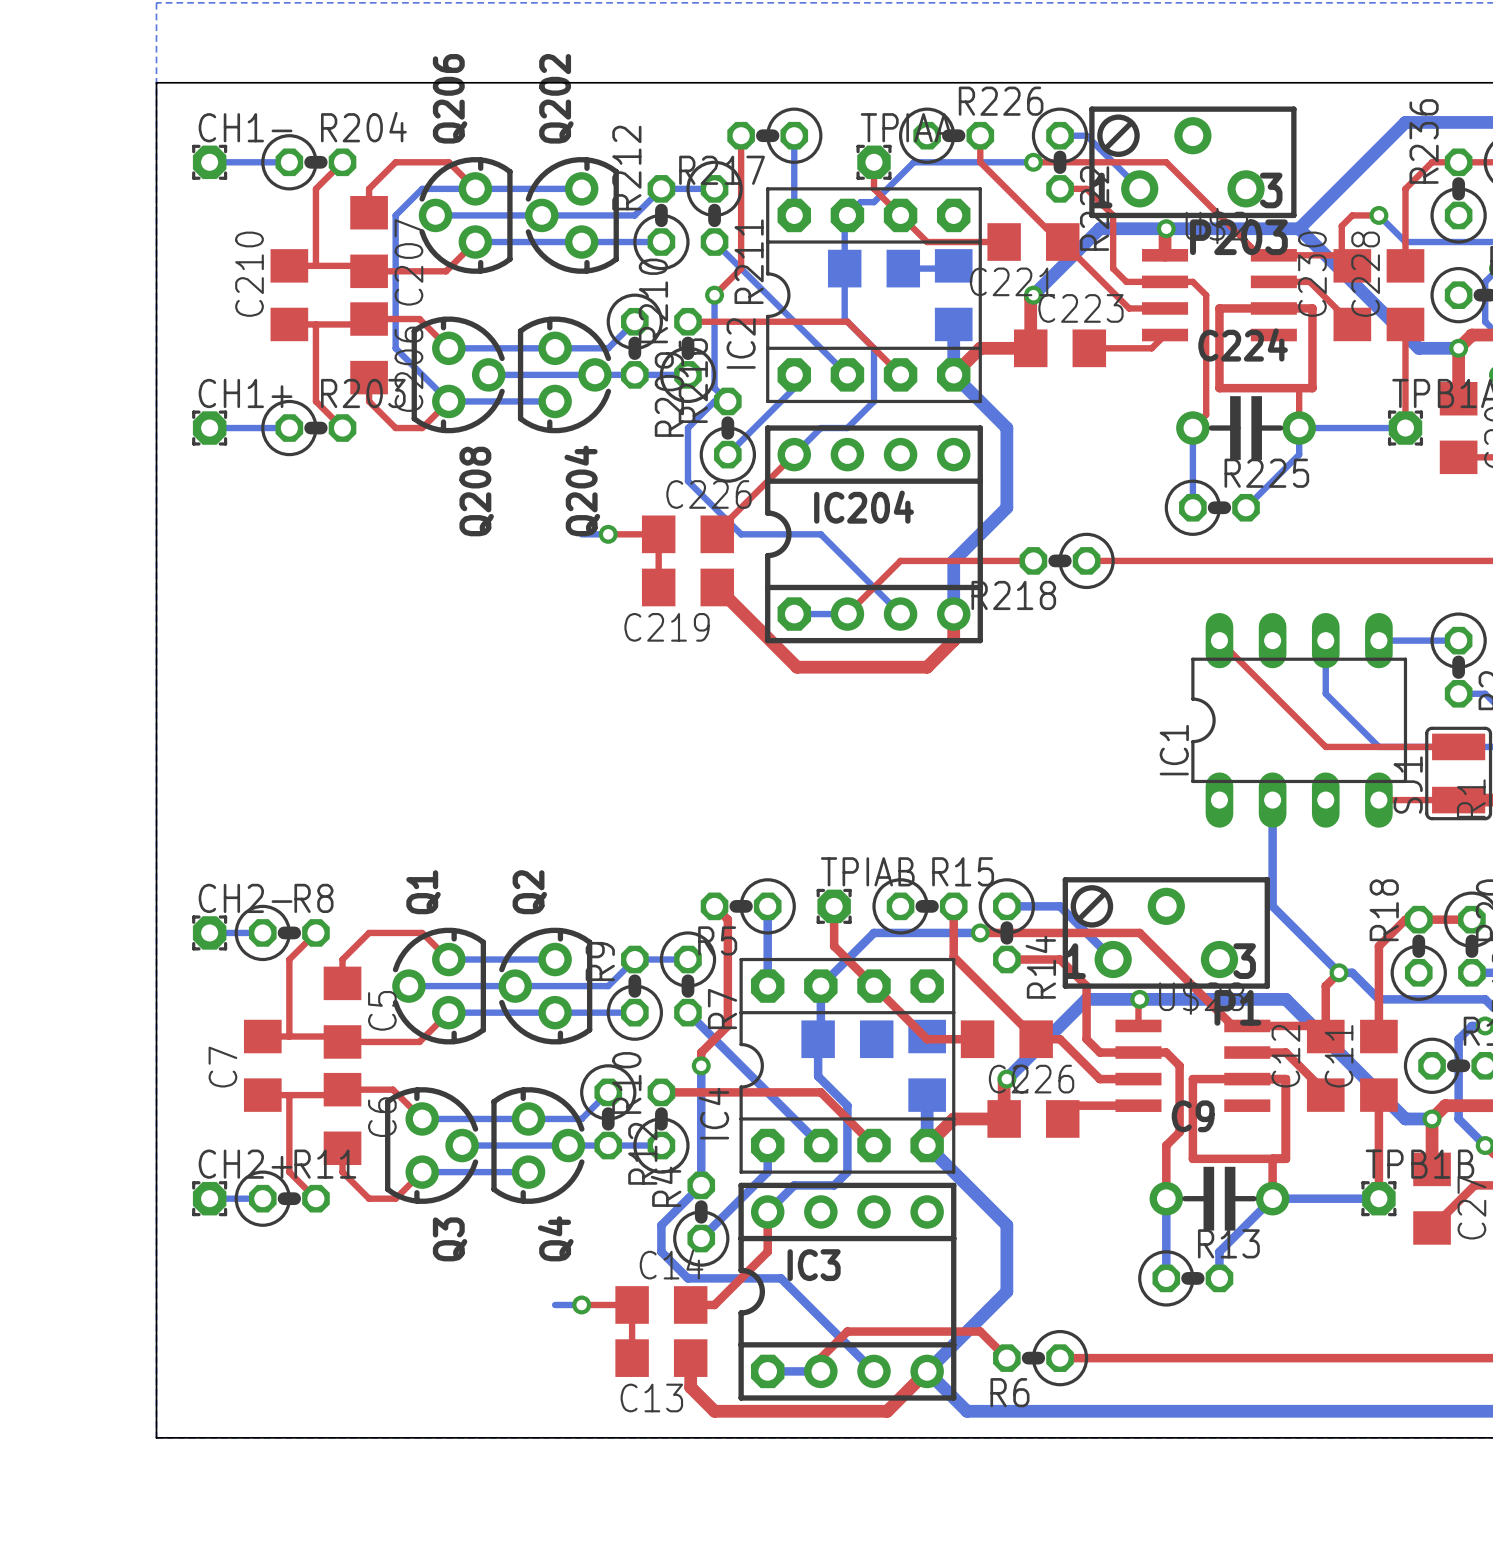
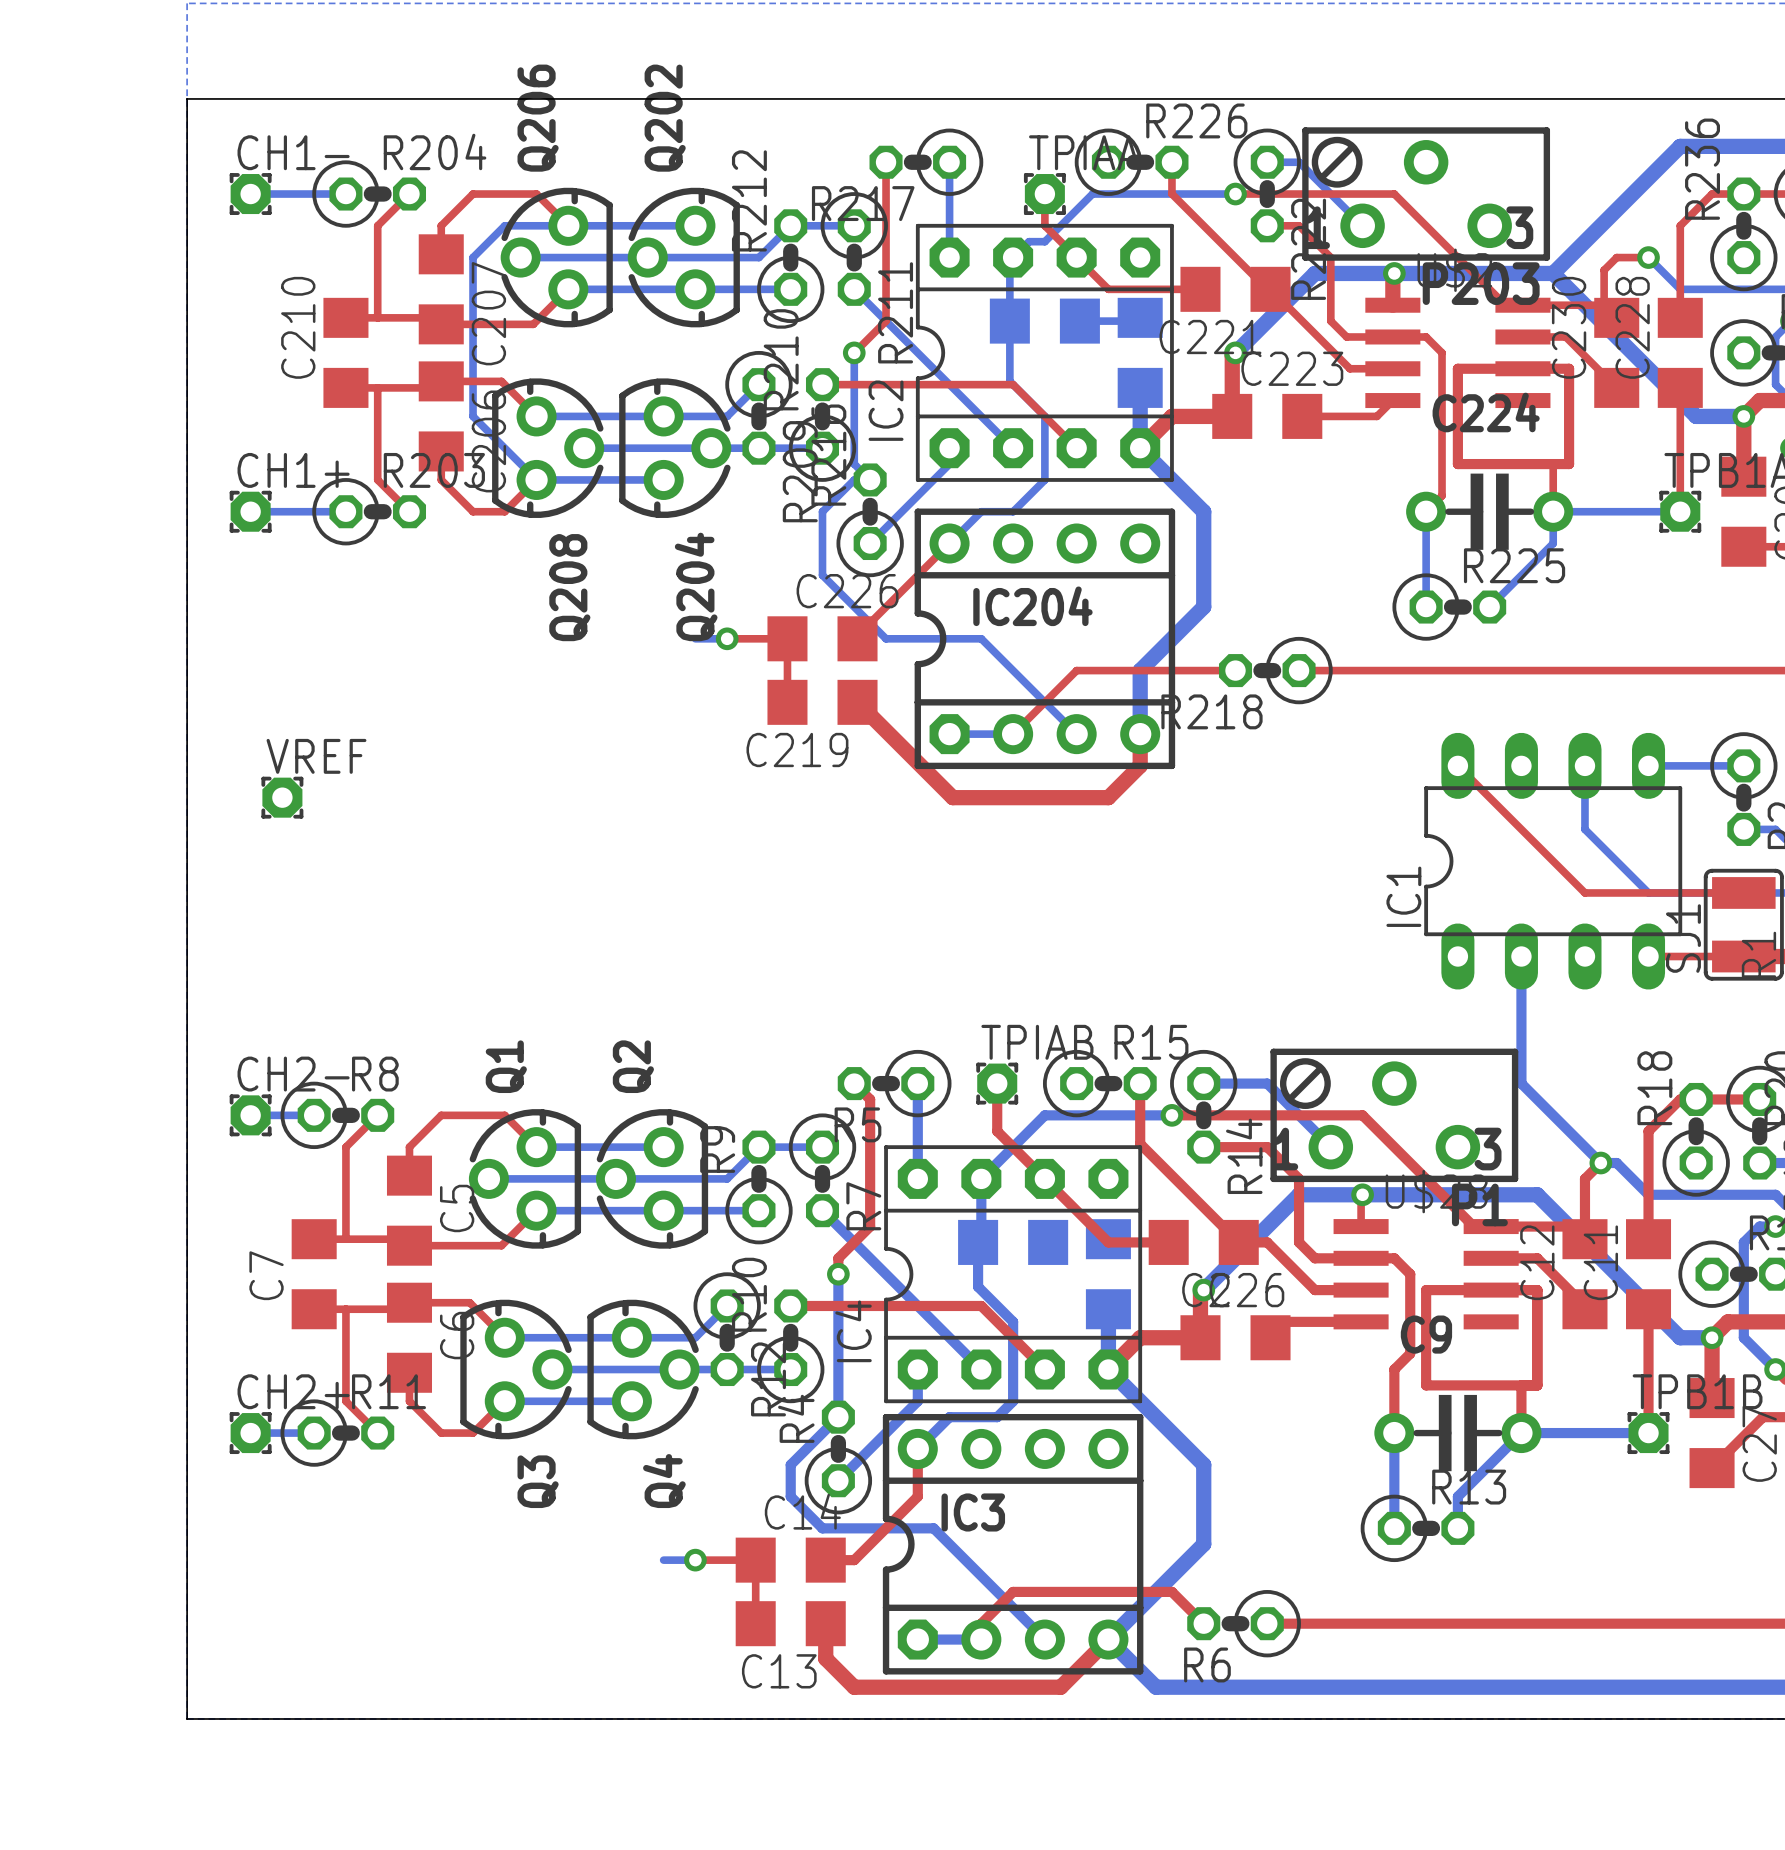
VREF: none -> (282, 797)

